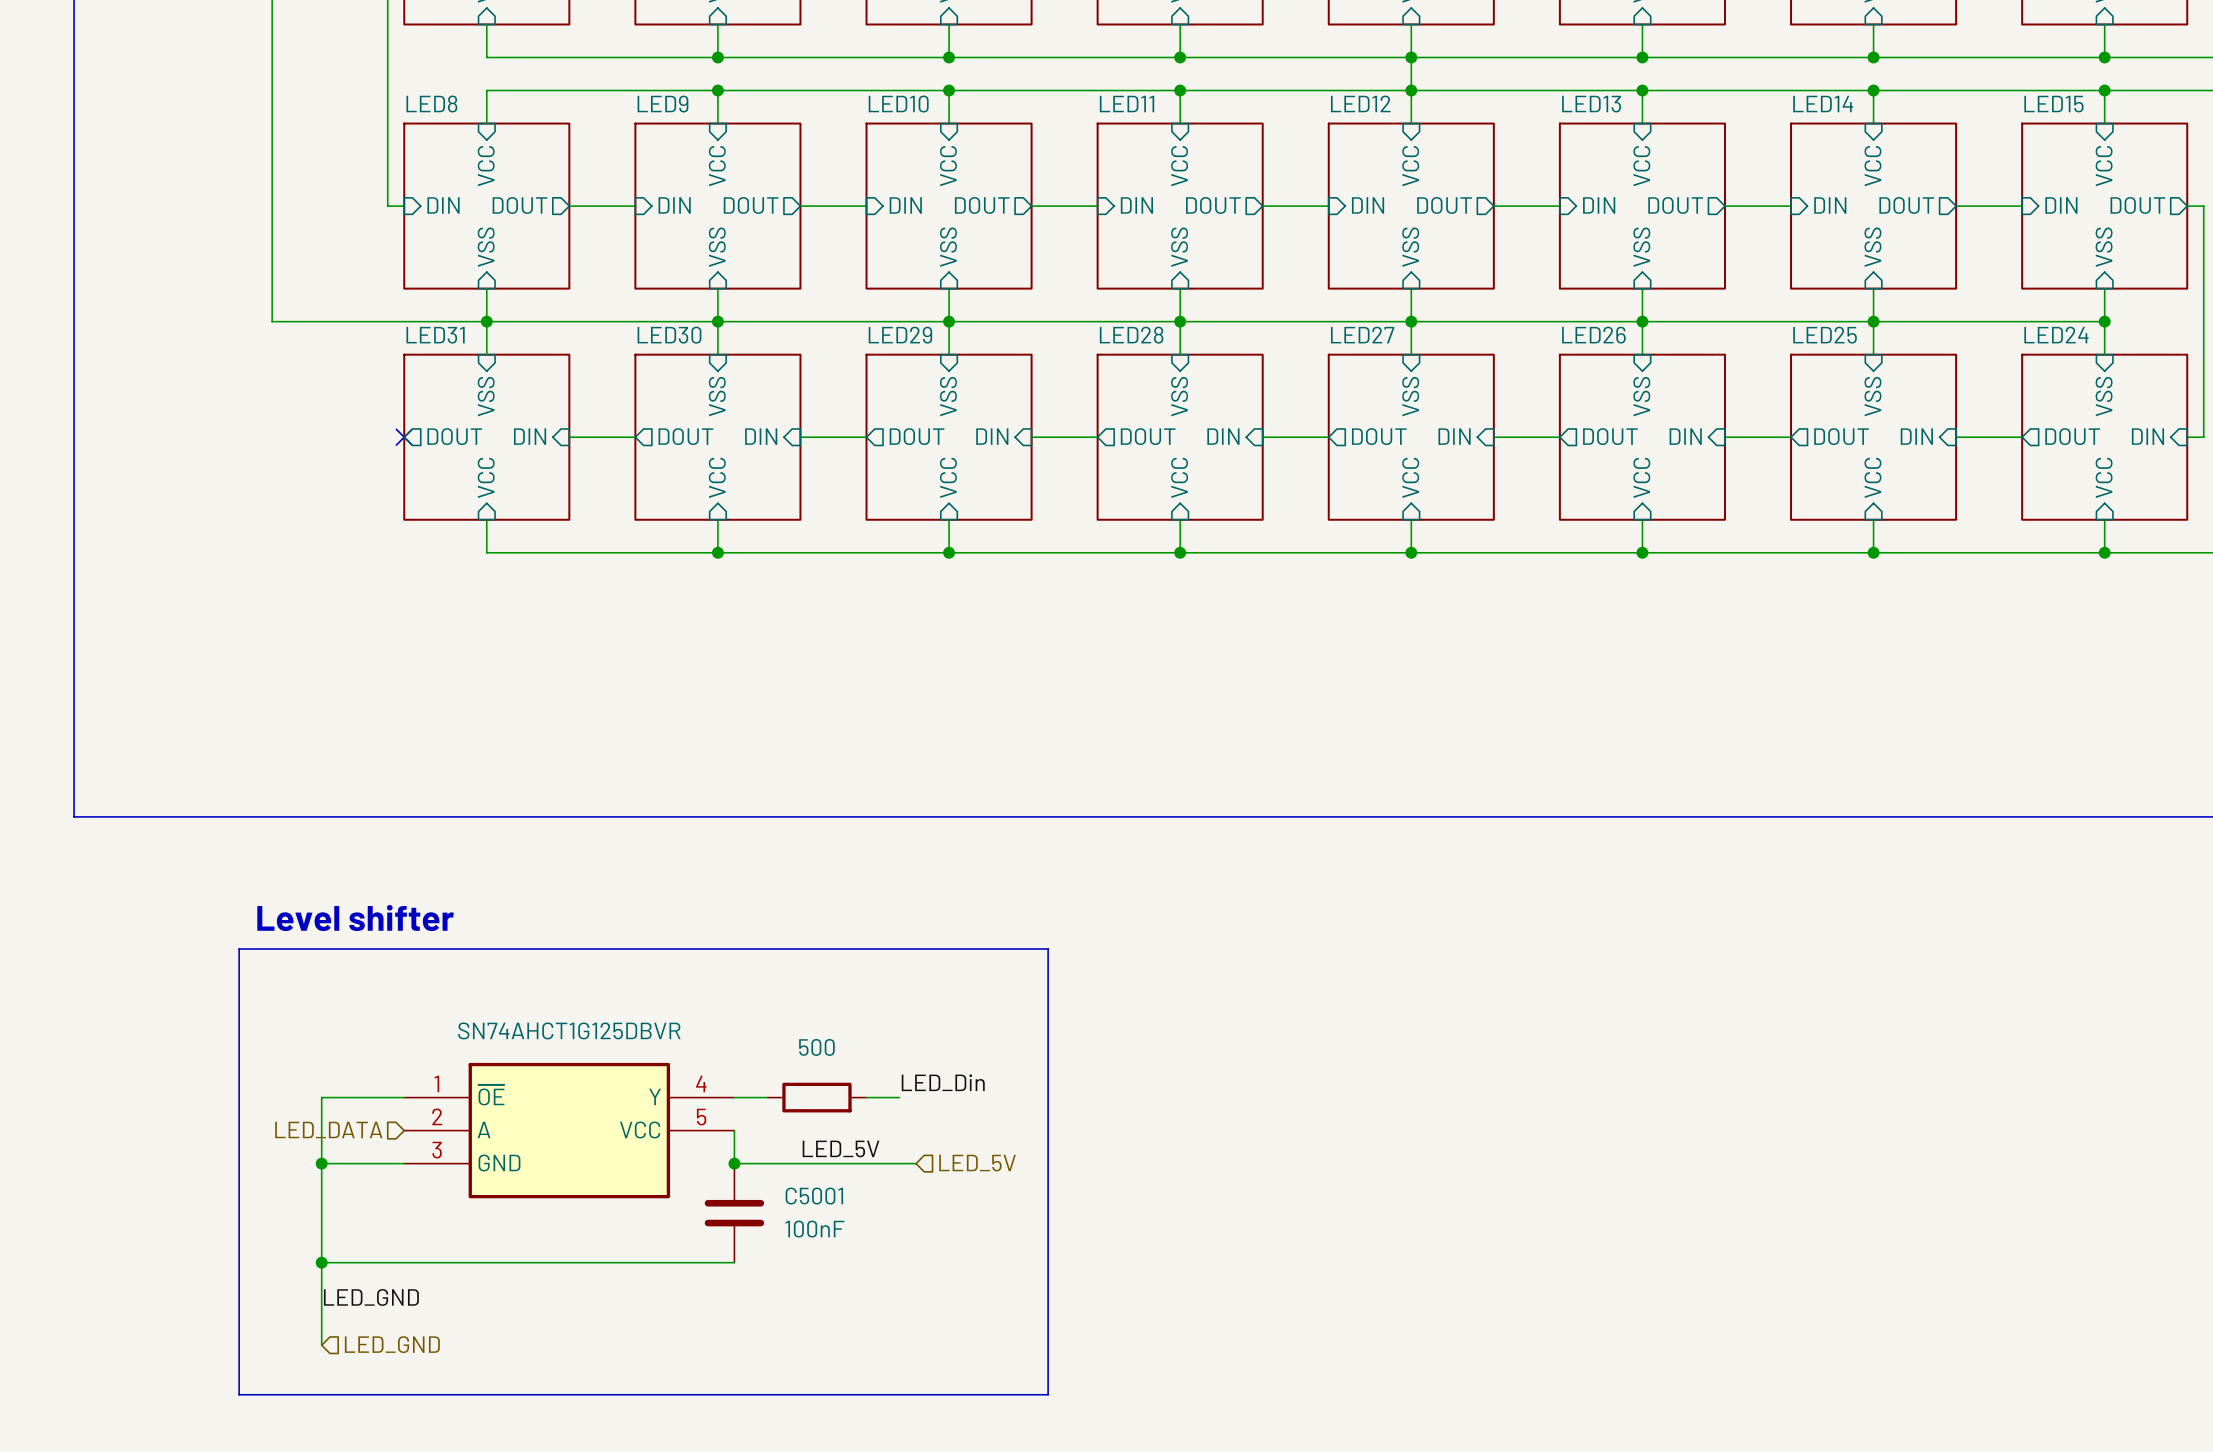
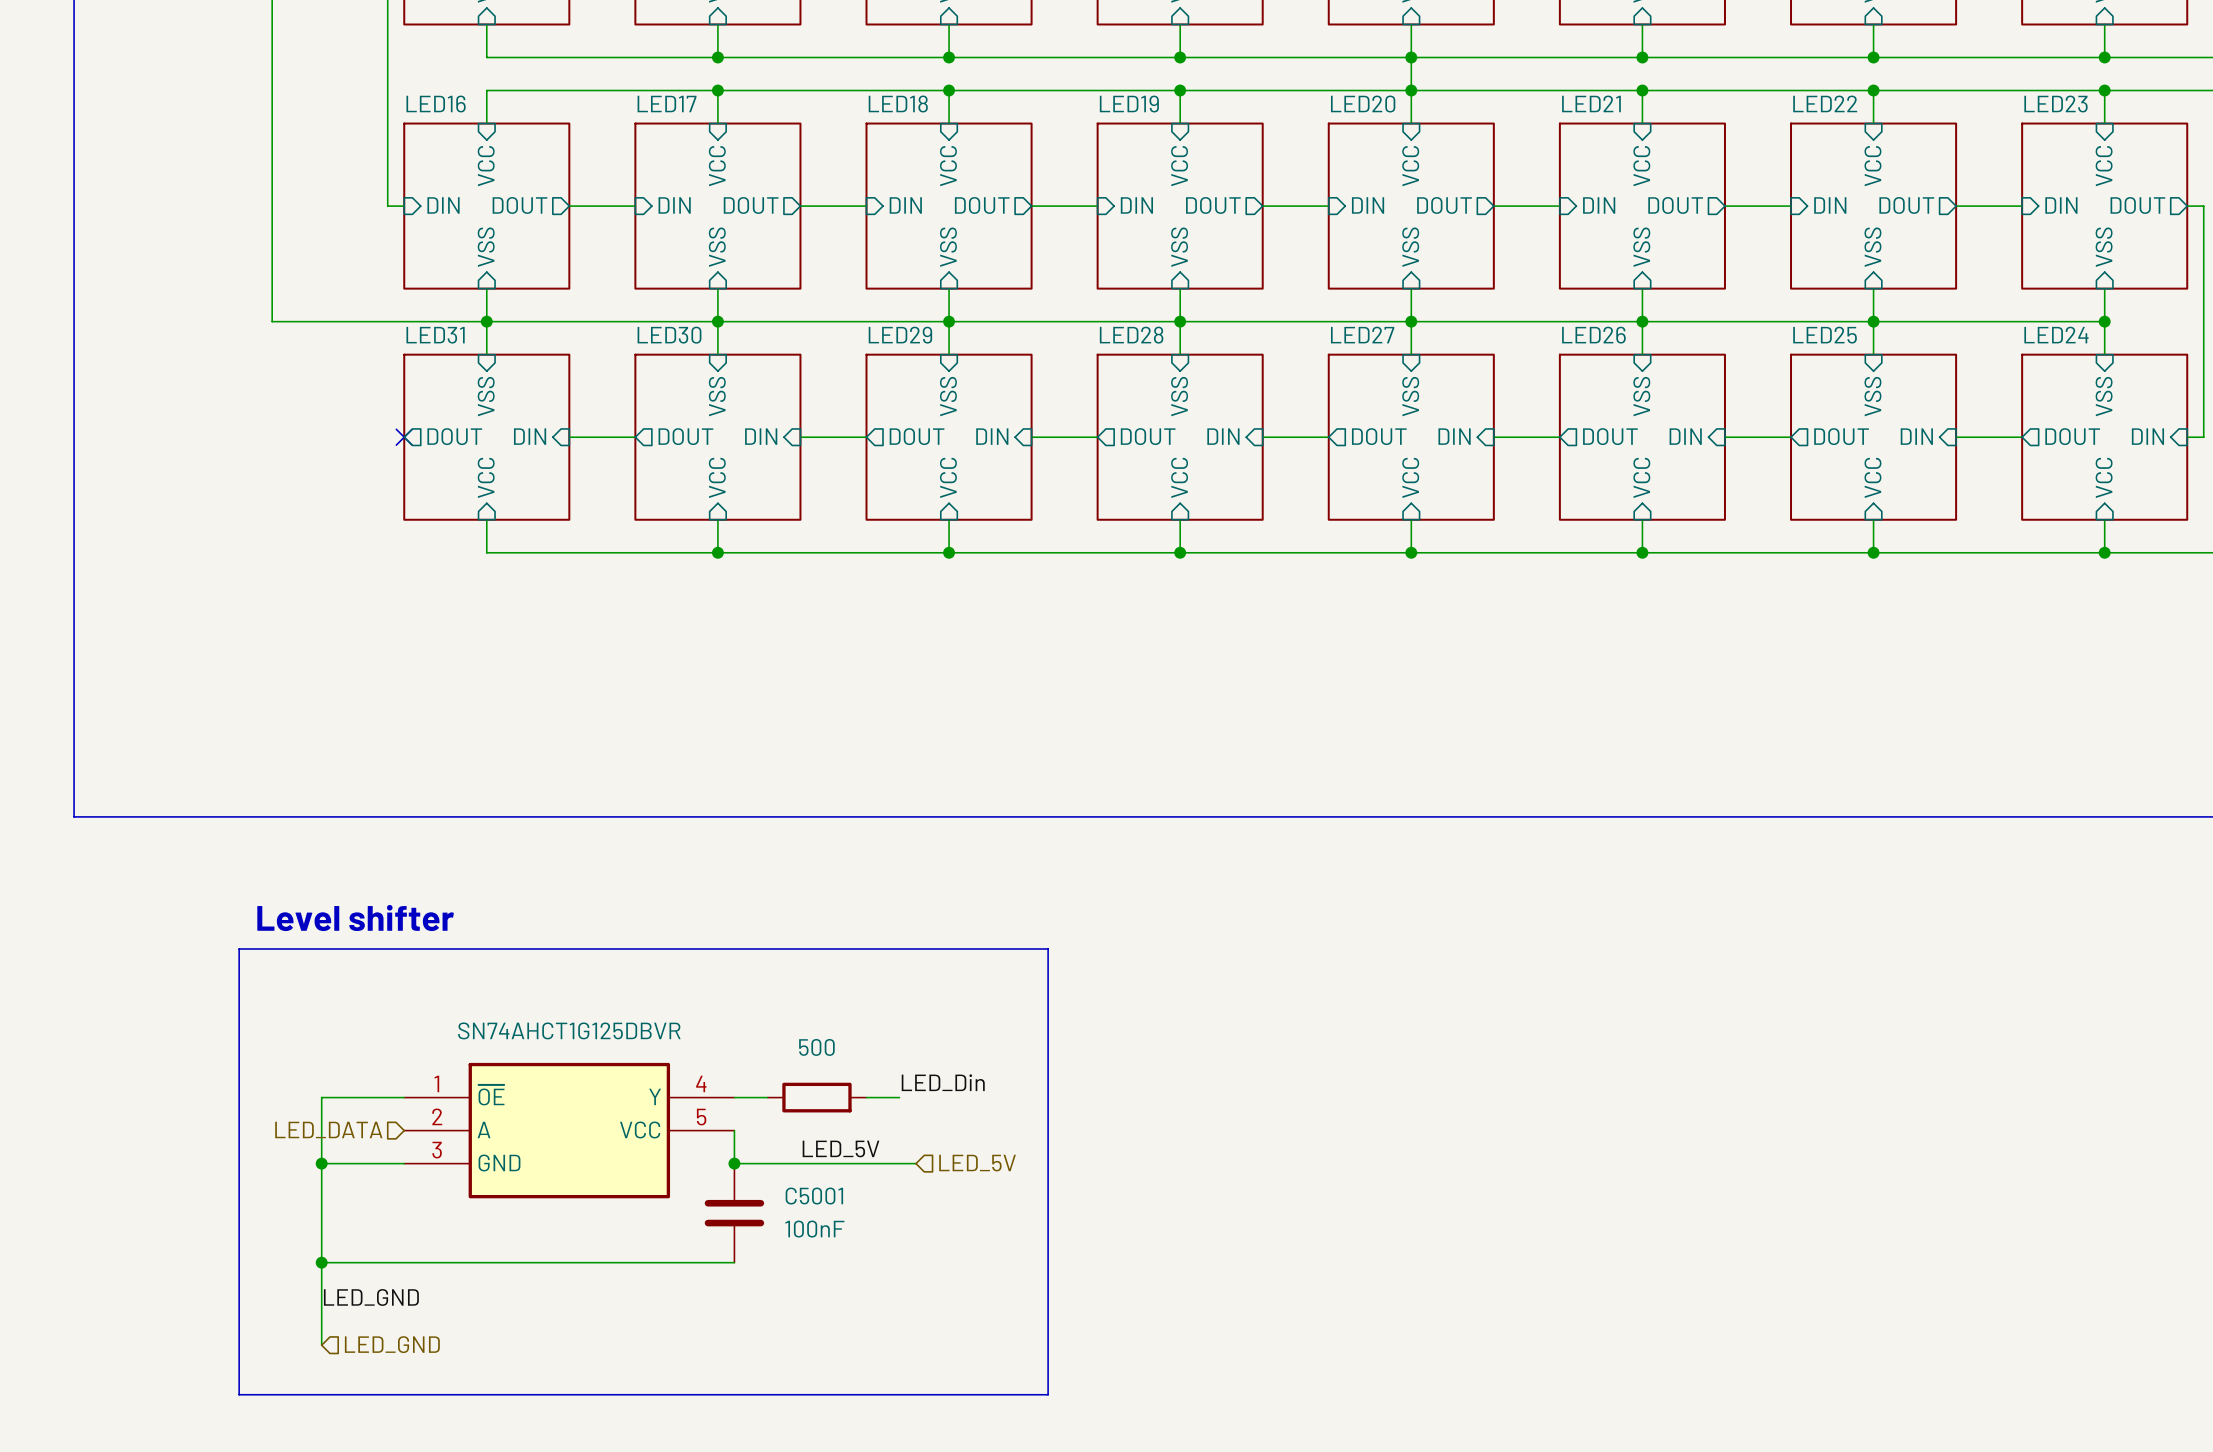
sheet LED8 name: LED8 (431, 103) -> LED16 (436, 104)
sheet LED12 name: LED12 (1360, 103) -> LED20 (1363, 104)
sheet LED9 name: LED9 (662, 104) -> LED17 (667, 104)
sheet LED10 name: LED10 (898, 104) -> LED18 (898, 103)
sheet LED11 name: LED11 (1127, 104) -> LED19 (1129, 104)
sheet LED13 name: LED13 (1591, 104) -> LED21 (1591, 103)
sheet LED14 name: LED14 (1823, 104) -> LED22 (1825, 103)
sheet LED15 name: LED15 (2053, 104) -> LED23 (2056, 104)

